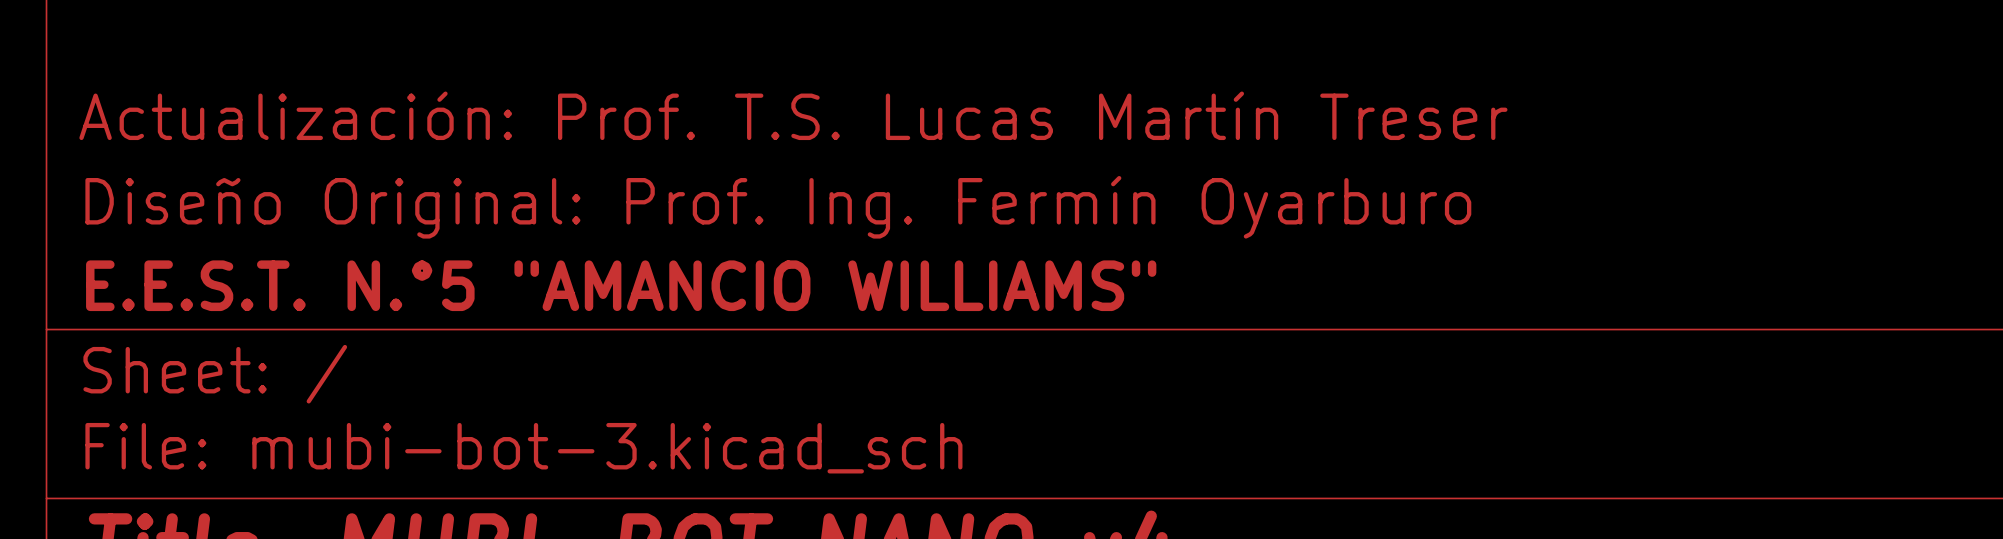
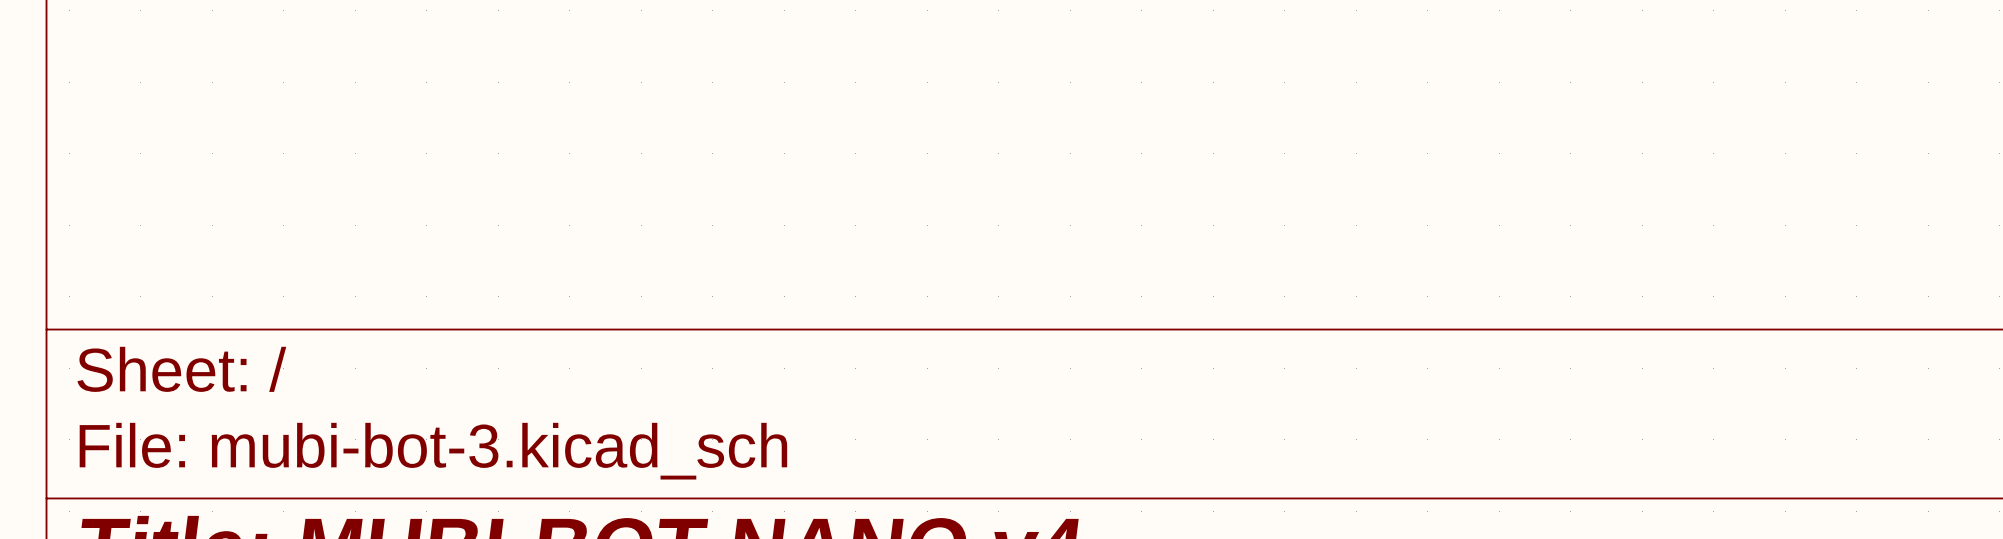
title block: Actualización: Prof. T.S. Lucas Martín Treser (793, 115) -> none
title block: Diseño Original: Prof. Ing. Fermín Oyarburo (778, 207) -> none
title block: E.E.S.T. N.°5 "AMANCIO WILLIAMS" (621, 285) -> none

